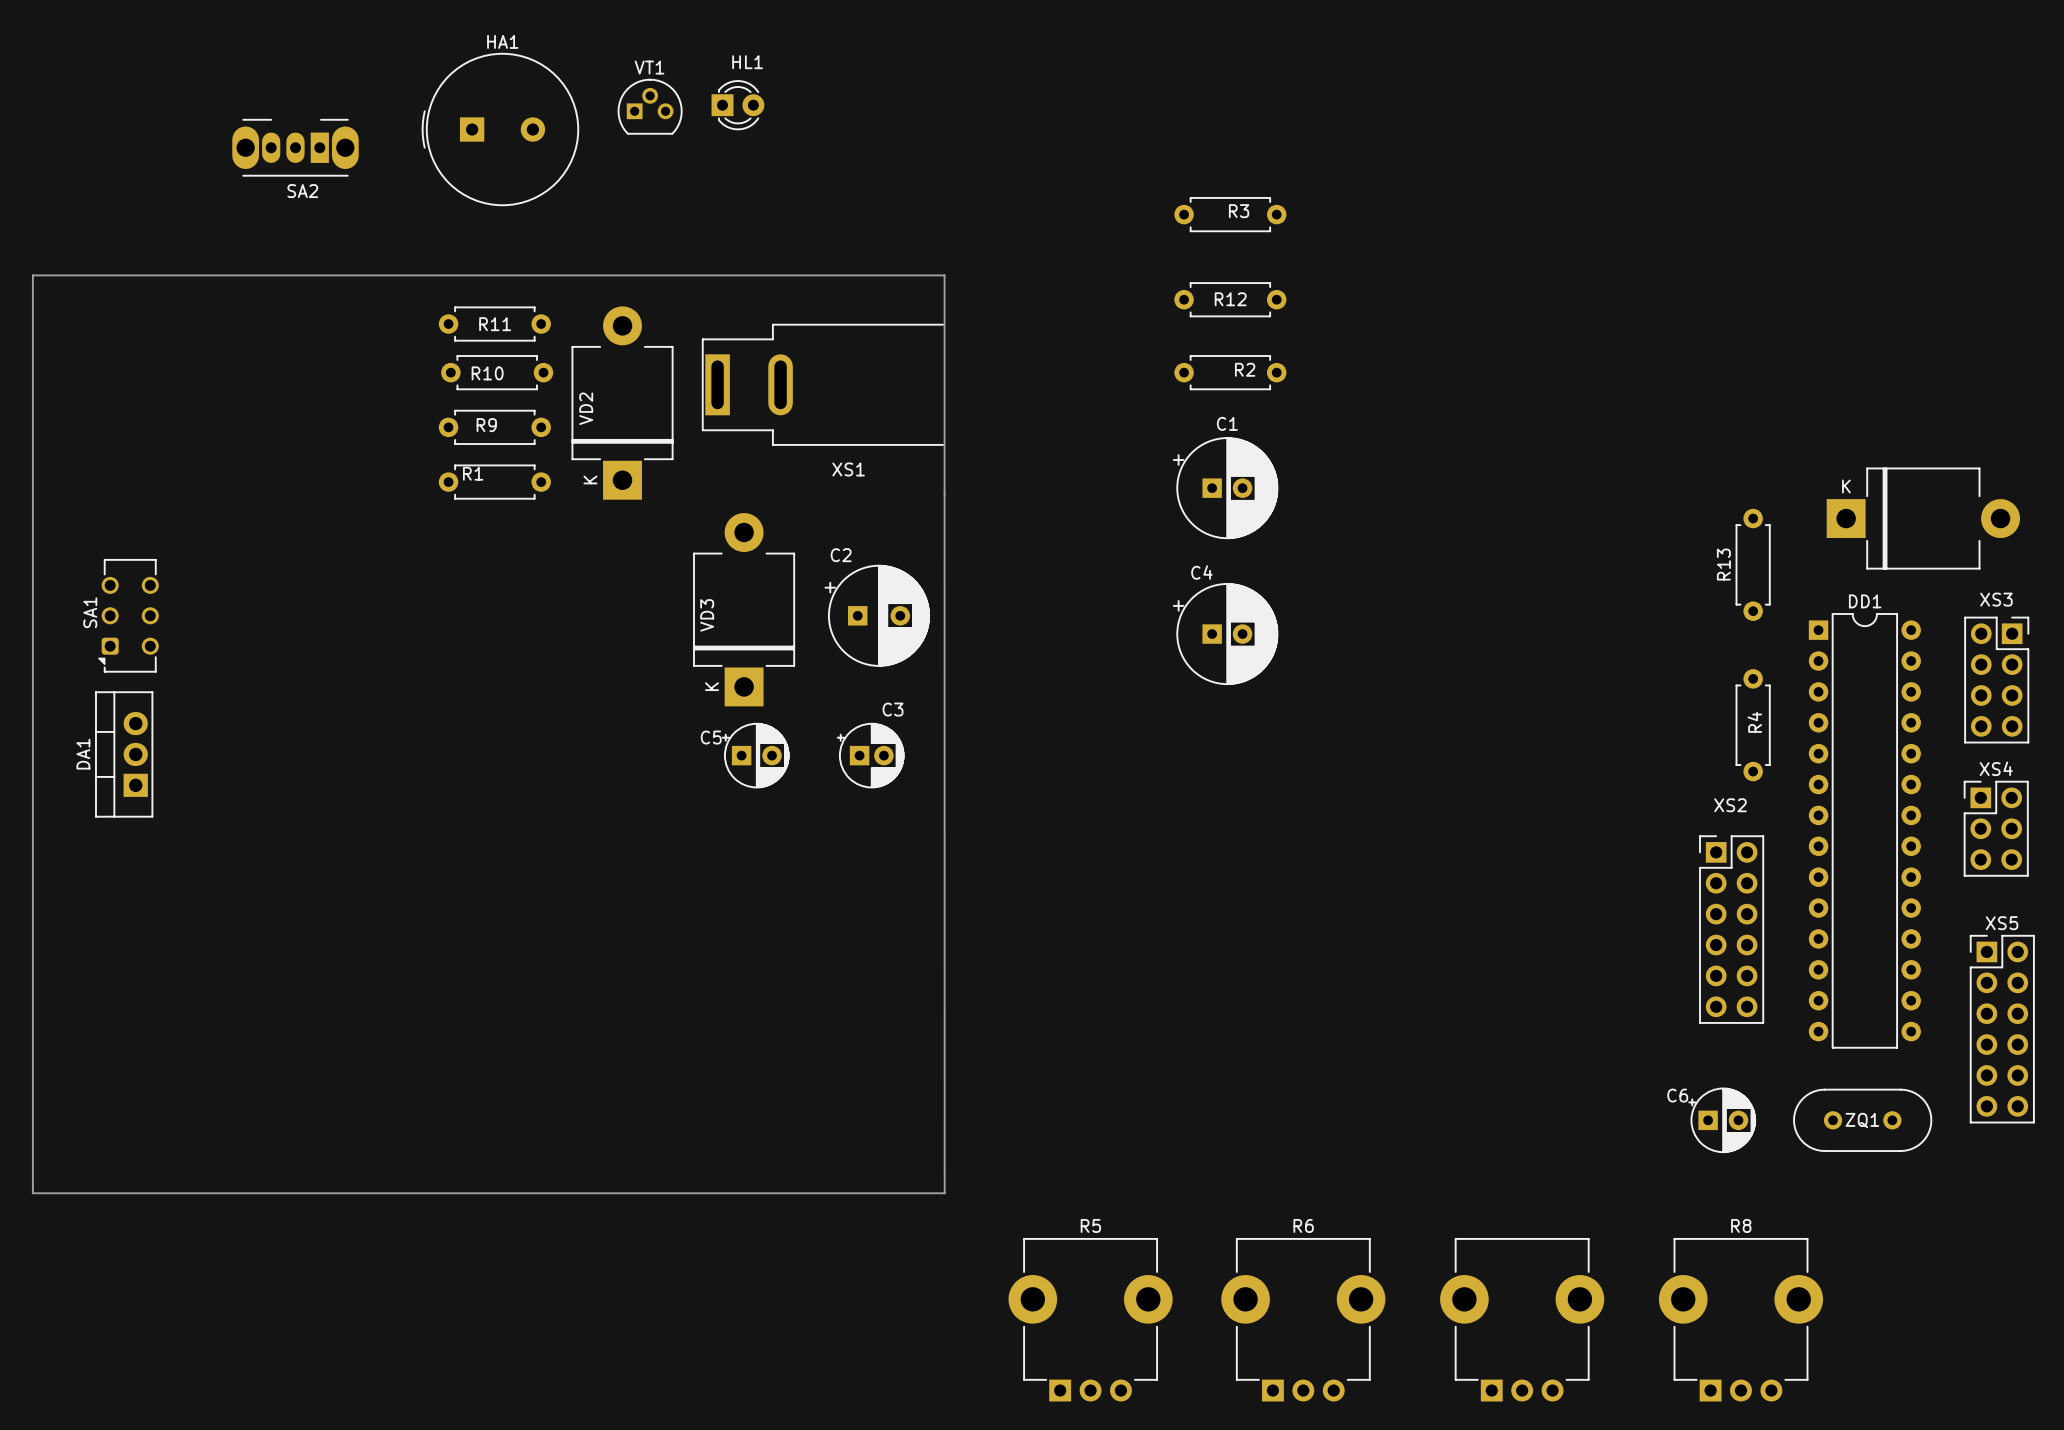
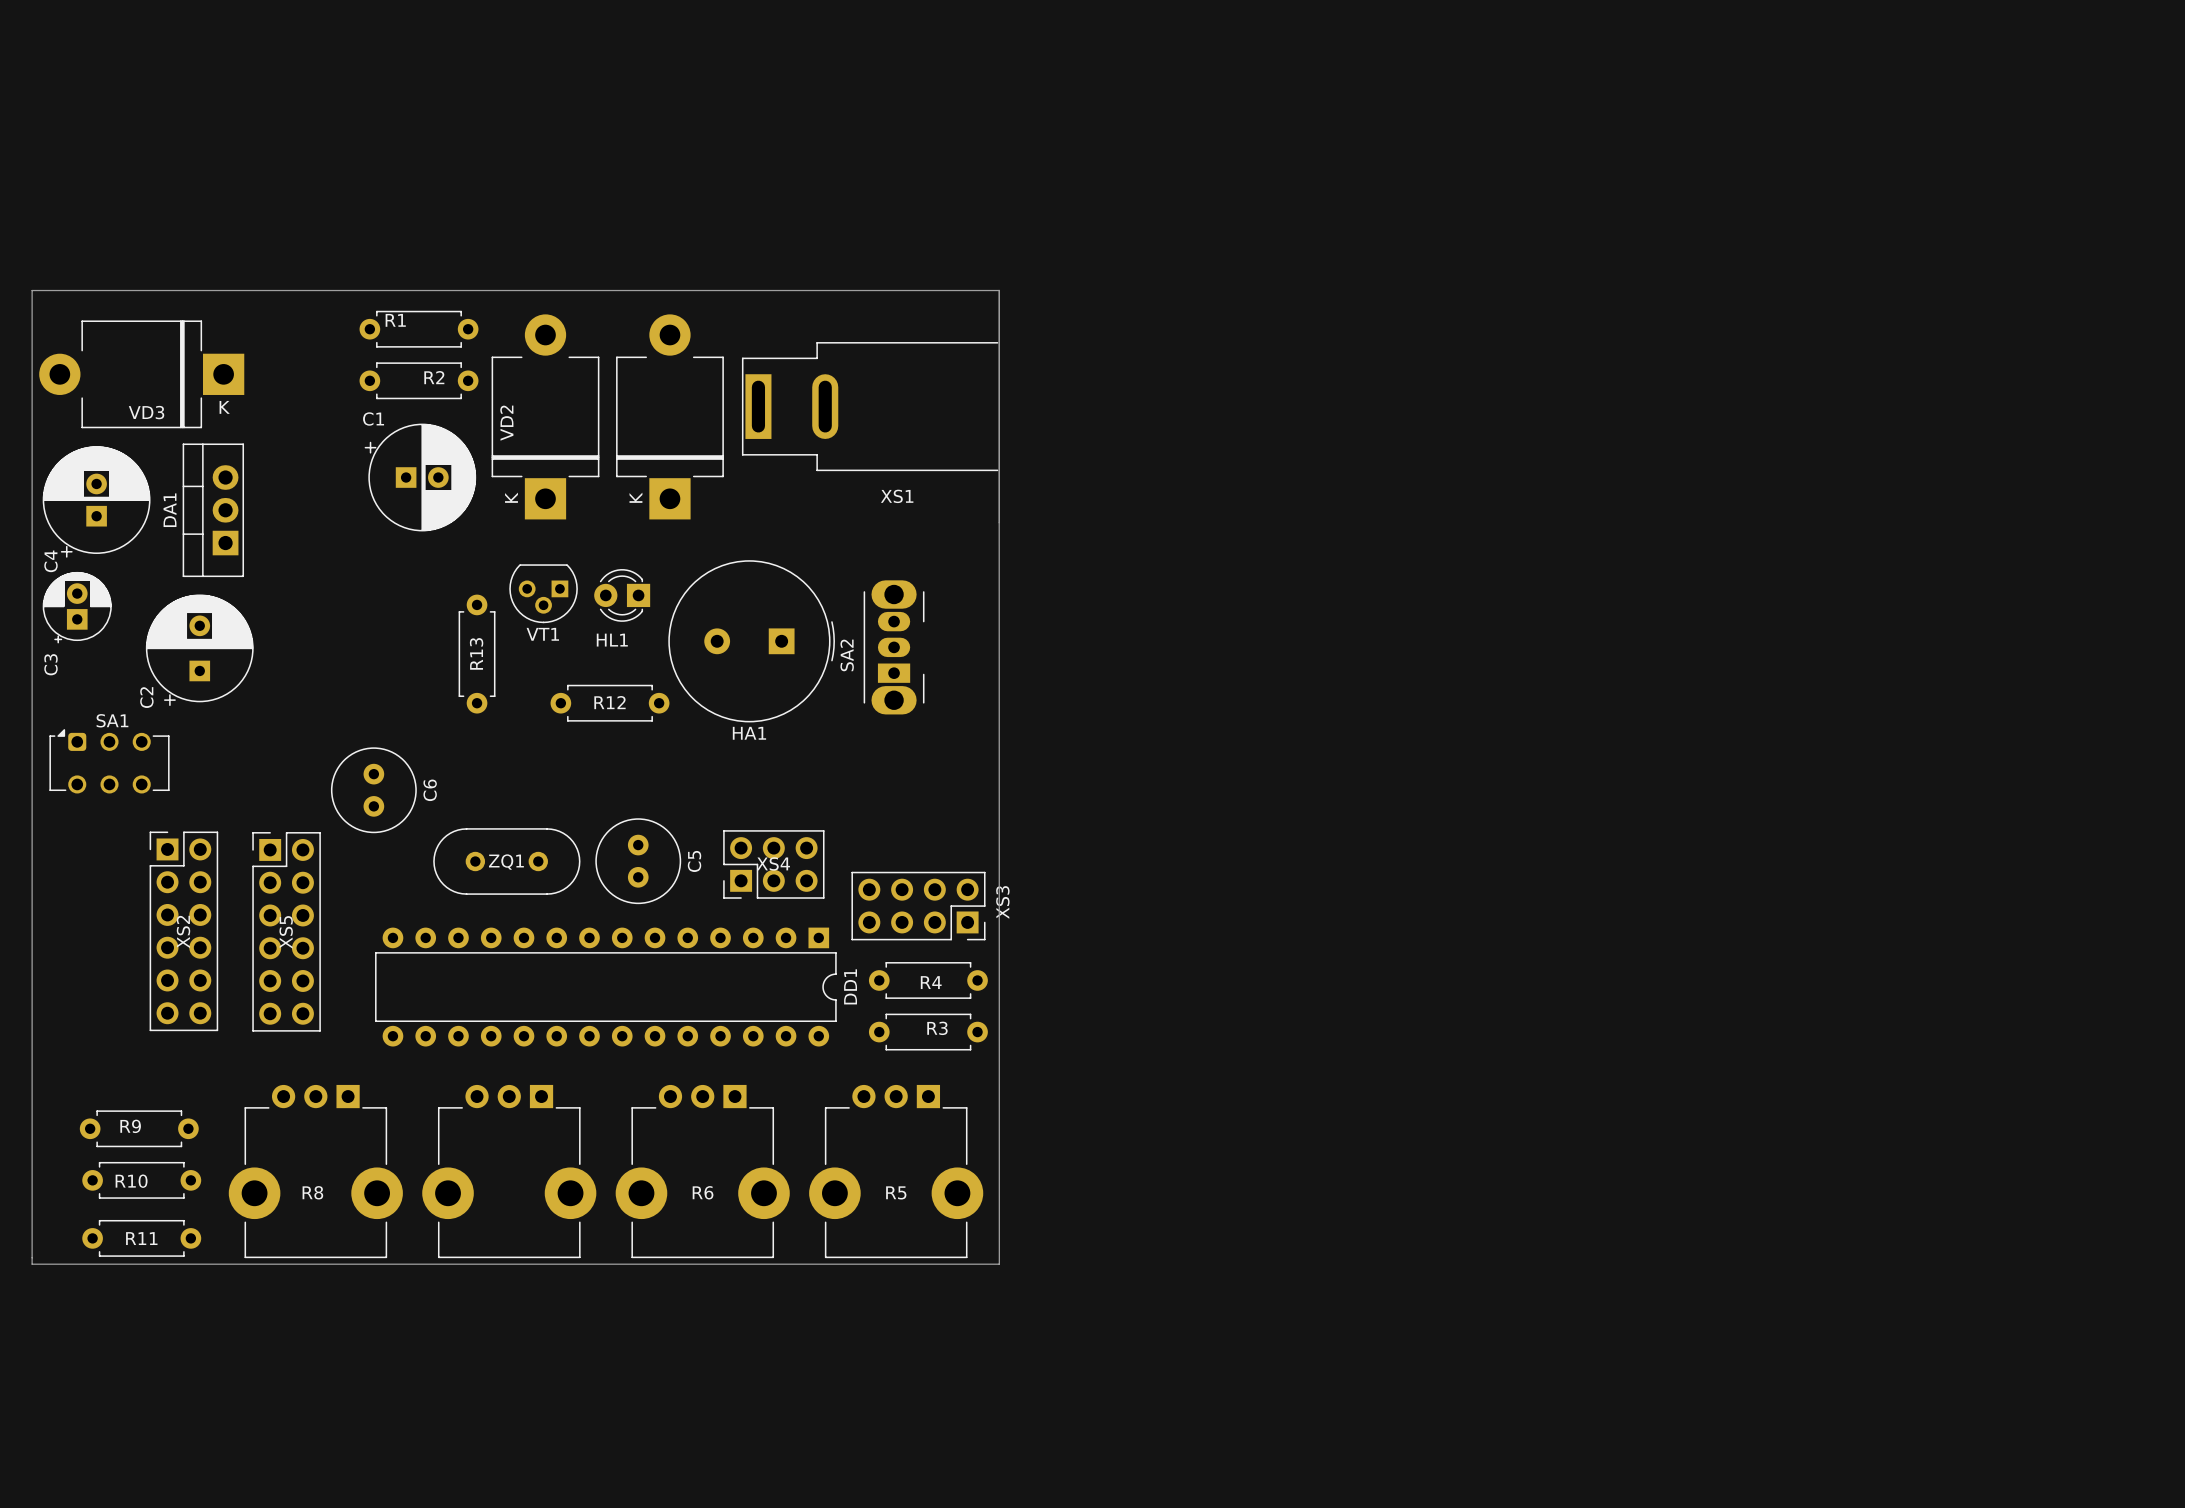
HL1 rotation: 0° (737, 105) -> 180° (622, 595)
HL1 position: (737, 105) -> (622, 595)
VT1 rotation: 0° (650, 106) -> 180° (543, 593)
VT1 position: (650, 106) -> (543, 593)
HA1 rotation: 0° (500, 129) -> 180° (751, 641)
HA1 position: (500, 129) -> (751, 641)
SA2 rotation: 0° (295, 147) -> 90° clockwise (894, 647)
SA2 position: (295, 147) -> (894, 647)
R3 position: (1230, 214) -> (928, 1032)
R12 position: (1230, 299) -> (610, 703)
R11 position: (494, 324) -> (141, 1238)
R10 position: (497, 372) -> (141, 1180)
R2 position: (1230, 372) -> (419, 380)
part: none -> (669, 416)
VD2 position: (622, 403) -> (545, 416)
C1 name position: C1 (1227, 423) -> C1 (373, 419)
R9 position: (494, 427) -> (139, 1128)
R1 position: (494, 482) -> (419, 329)
C1 position: (1225, 488) -> (420, 477)
part: (1923, 518) -> none
R13 name position: R13 (1723, 564) -> R13 (476, 653)
R13 position: (1753, 564) -> (477, 654)
C4 name position: C4 (1201, 572) -> C4 (50, 561)
VD3 rotation: 0° (744, 609) -> 90° counterclockwise (141, 374)
VD3 position: (744, 609) -> (141, 374)
SA1 rotation: 0° (128, 615) -> 90° clockwise (109, 761)
SA1 position: (128, 615) -> (109, 761)
C2 rotation: 0° (877, 615) -> 90° counterclockwise (199, 650)
C2 position: (877, 615) -> (199, 650)
C4 rotation: 0° (1225, 634) -> 90° counterclockwise (96, 501)
C4 position: (1225, 634) -> (96, 501)
XS3 rotation: 0° (1996, 680) -> 90° clockwise (918, 906)
XS3 position: (1996, 680) -> (918, 906)
C3 name position: C3 (893, 709) -> C3 (50, 664)
C5 footprint: [721, 723, 790, 789] -> [595, 818, 682, 905]
R4 rotation: 0° (1753, 725) -> 90° clockwise (928, 980)
R4 position: (1753, 725) -> (928, 980)
C5 name position: C5 (711, 737) -> C5 (694, 861)
DA1 position: (124, 754) -> (213, 510)
C3 rotation: 0° (870, 755) -> 90° counterclockwise (77, 607)
C3 position: (870, 755) -> (77, 607)
XS4 name position: XS4 (1996, 768) -> XS4 (773, 863)
XS2 name rotation: 0° (1730, 805) -> 90° counterclockwise (183, 931)
XS2 name position: XS2 (1730, 805) -> XS2 (183, 931)
XS4 rotation: 0° (1996, 828) -> 90° counterclockwise (773, 864)
XS4 position: (1996, 828) -> (773, 864)
DD1 rotation: 0° (1864, 830) -> 90° clockwise (605, 987)
DD1 position: (1864, 830) -> (605, 987)
XS5 name rotation: 0° (2002, 923) -> 90° counterclockwise (286, 932)
XS5 name position: XS5 (2002, 923) -> XS5 (286, 932)
XS2 position: (1731, 929) -> (183, 931)
XS5 position: (2002, 1029) -> (286, 931)
C6 footprint: [1688, 1087, 1756, 1153] -> [330, 747, 417, 834]
C6 name position: C6 (1677, 1095) -> C6 (430, 790)
part: none -> (509, 1171)
ZQ1 position: (1862, 1120) -> (506, 861)
R5 name position: R5 (1090, 1225) -> R5 (896, 1192)
R6 name position: R6 (1303, 1225) -> R6 (703, 1192)
R8 name position: R8 (1741, 1225) -> R8 (312, 1192)
R5 rotation: 0° (1090, 1319) -> 180° (896, 1171)
R5 position: (1090, 1319) -> (896, 1171)
R6 rotation: 0° (1303, 1319) -> 180° (702, 1171)
R6 position: (1303, 1319) -> (702, 1171)
part: (1522, 1319) -> none
R8 rotation: 0° (1740, 1319) -> 180° (315, 1171)
R8 position: (1740, 1319) -> (315, 1171)

